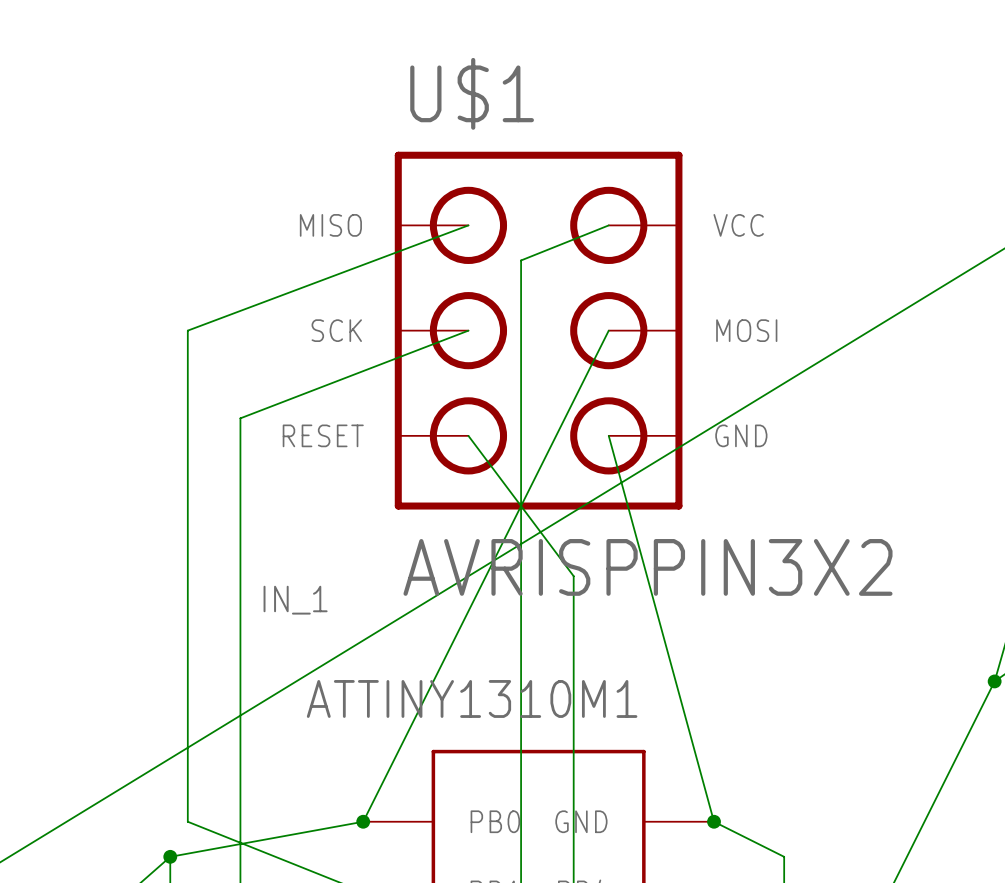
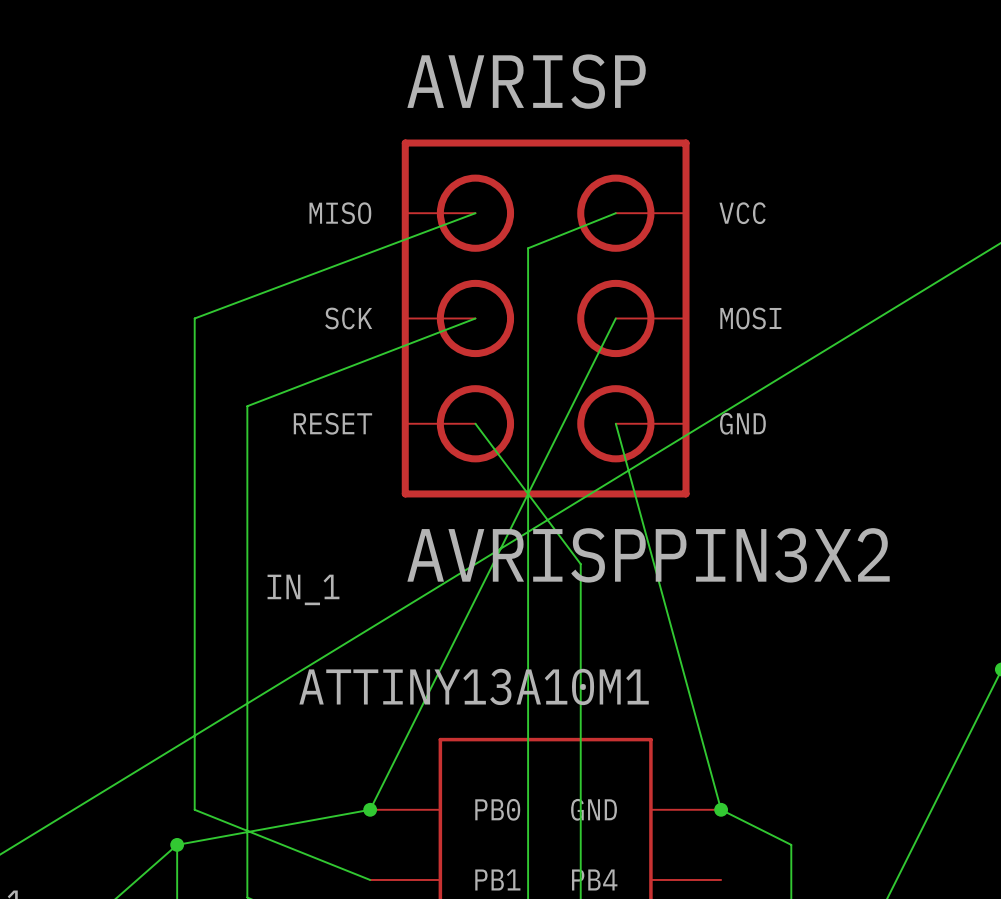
U$1 name: U$1 (472, 93) -> AVRISP (526, 81)
part value: ATTINY1310M1 (472, 698) -> ATTINY13A10M1 (474, 686)

